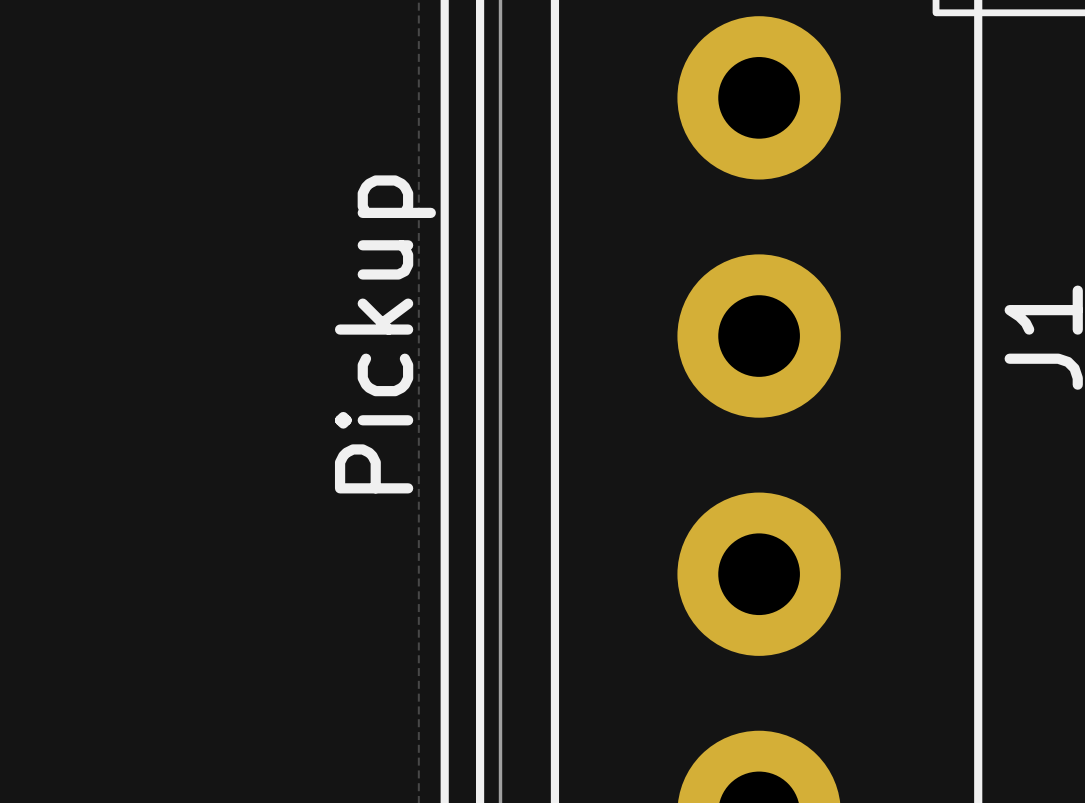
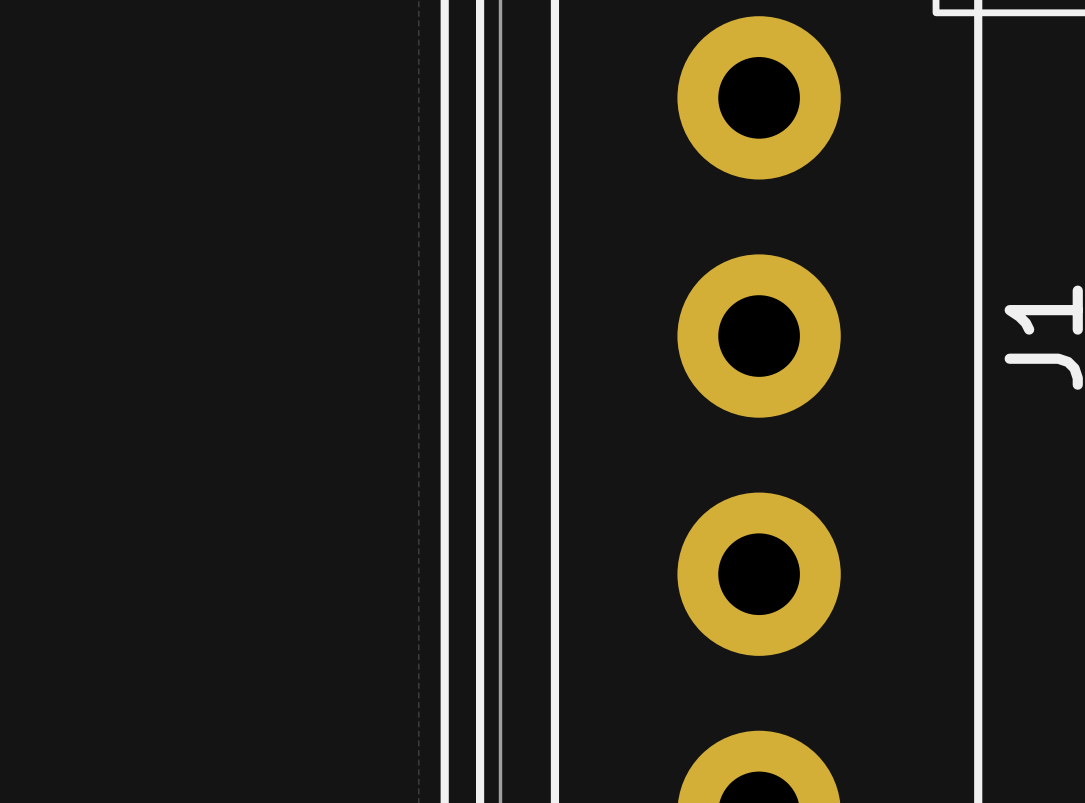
J1 value: Pickup (385, 334) -> none

